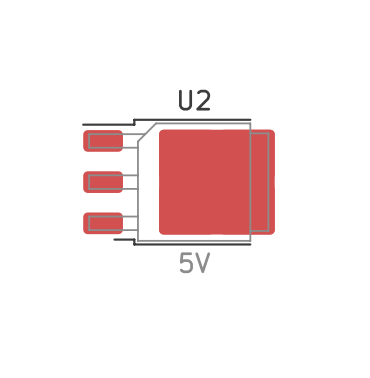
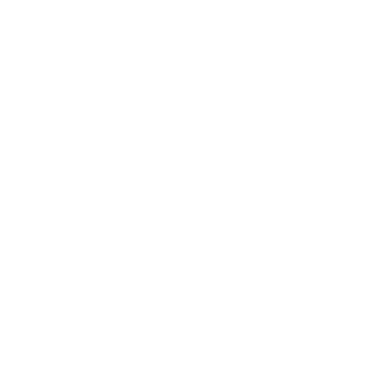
U2: 5V (178, 182) -> none

